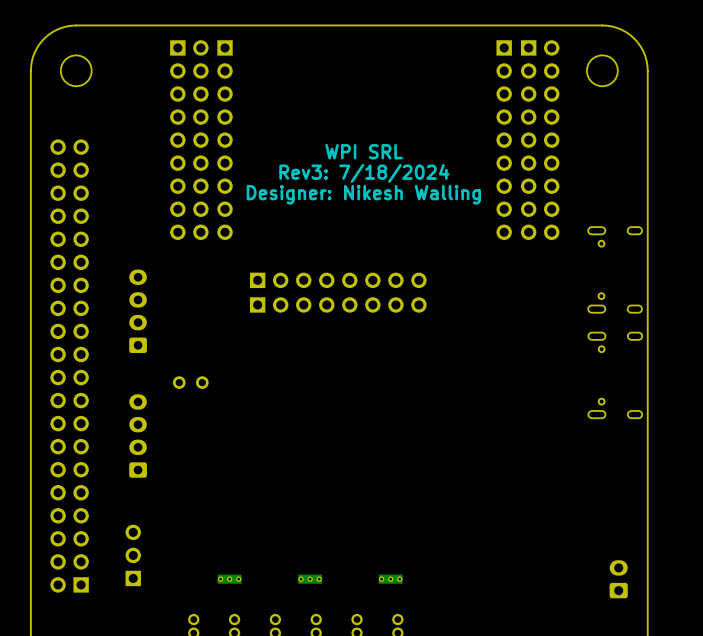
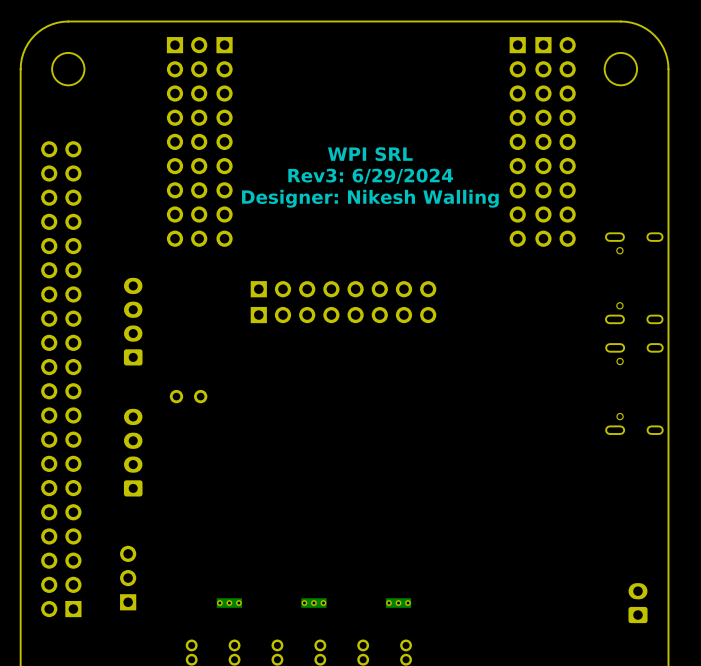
text: Rev3: 7/18/2024 (364, 173) -> Rev3: 6/29/2024 (370, 176)

